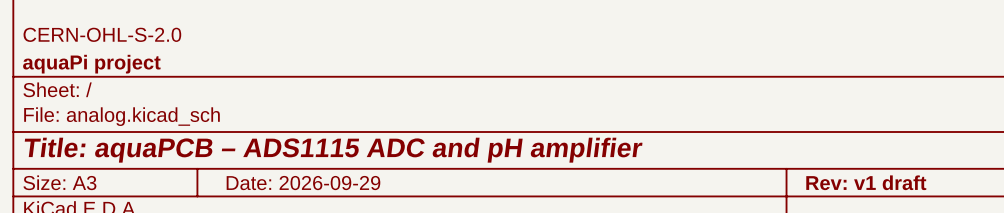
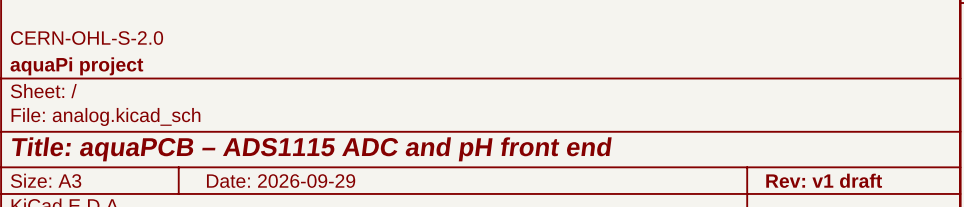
title block: Title: aquaPCB – ADS1115 ADC and pH amplifier (333, 150) -> Title: aquaPCB – ADS1115 ADC and pH front end (311, 149)

